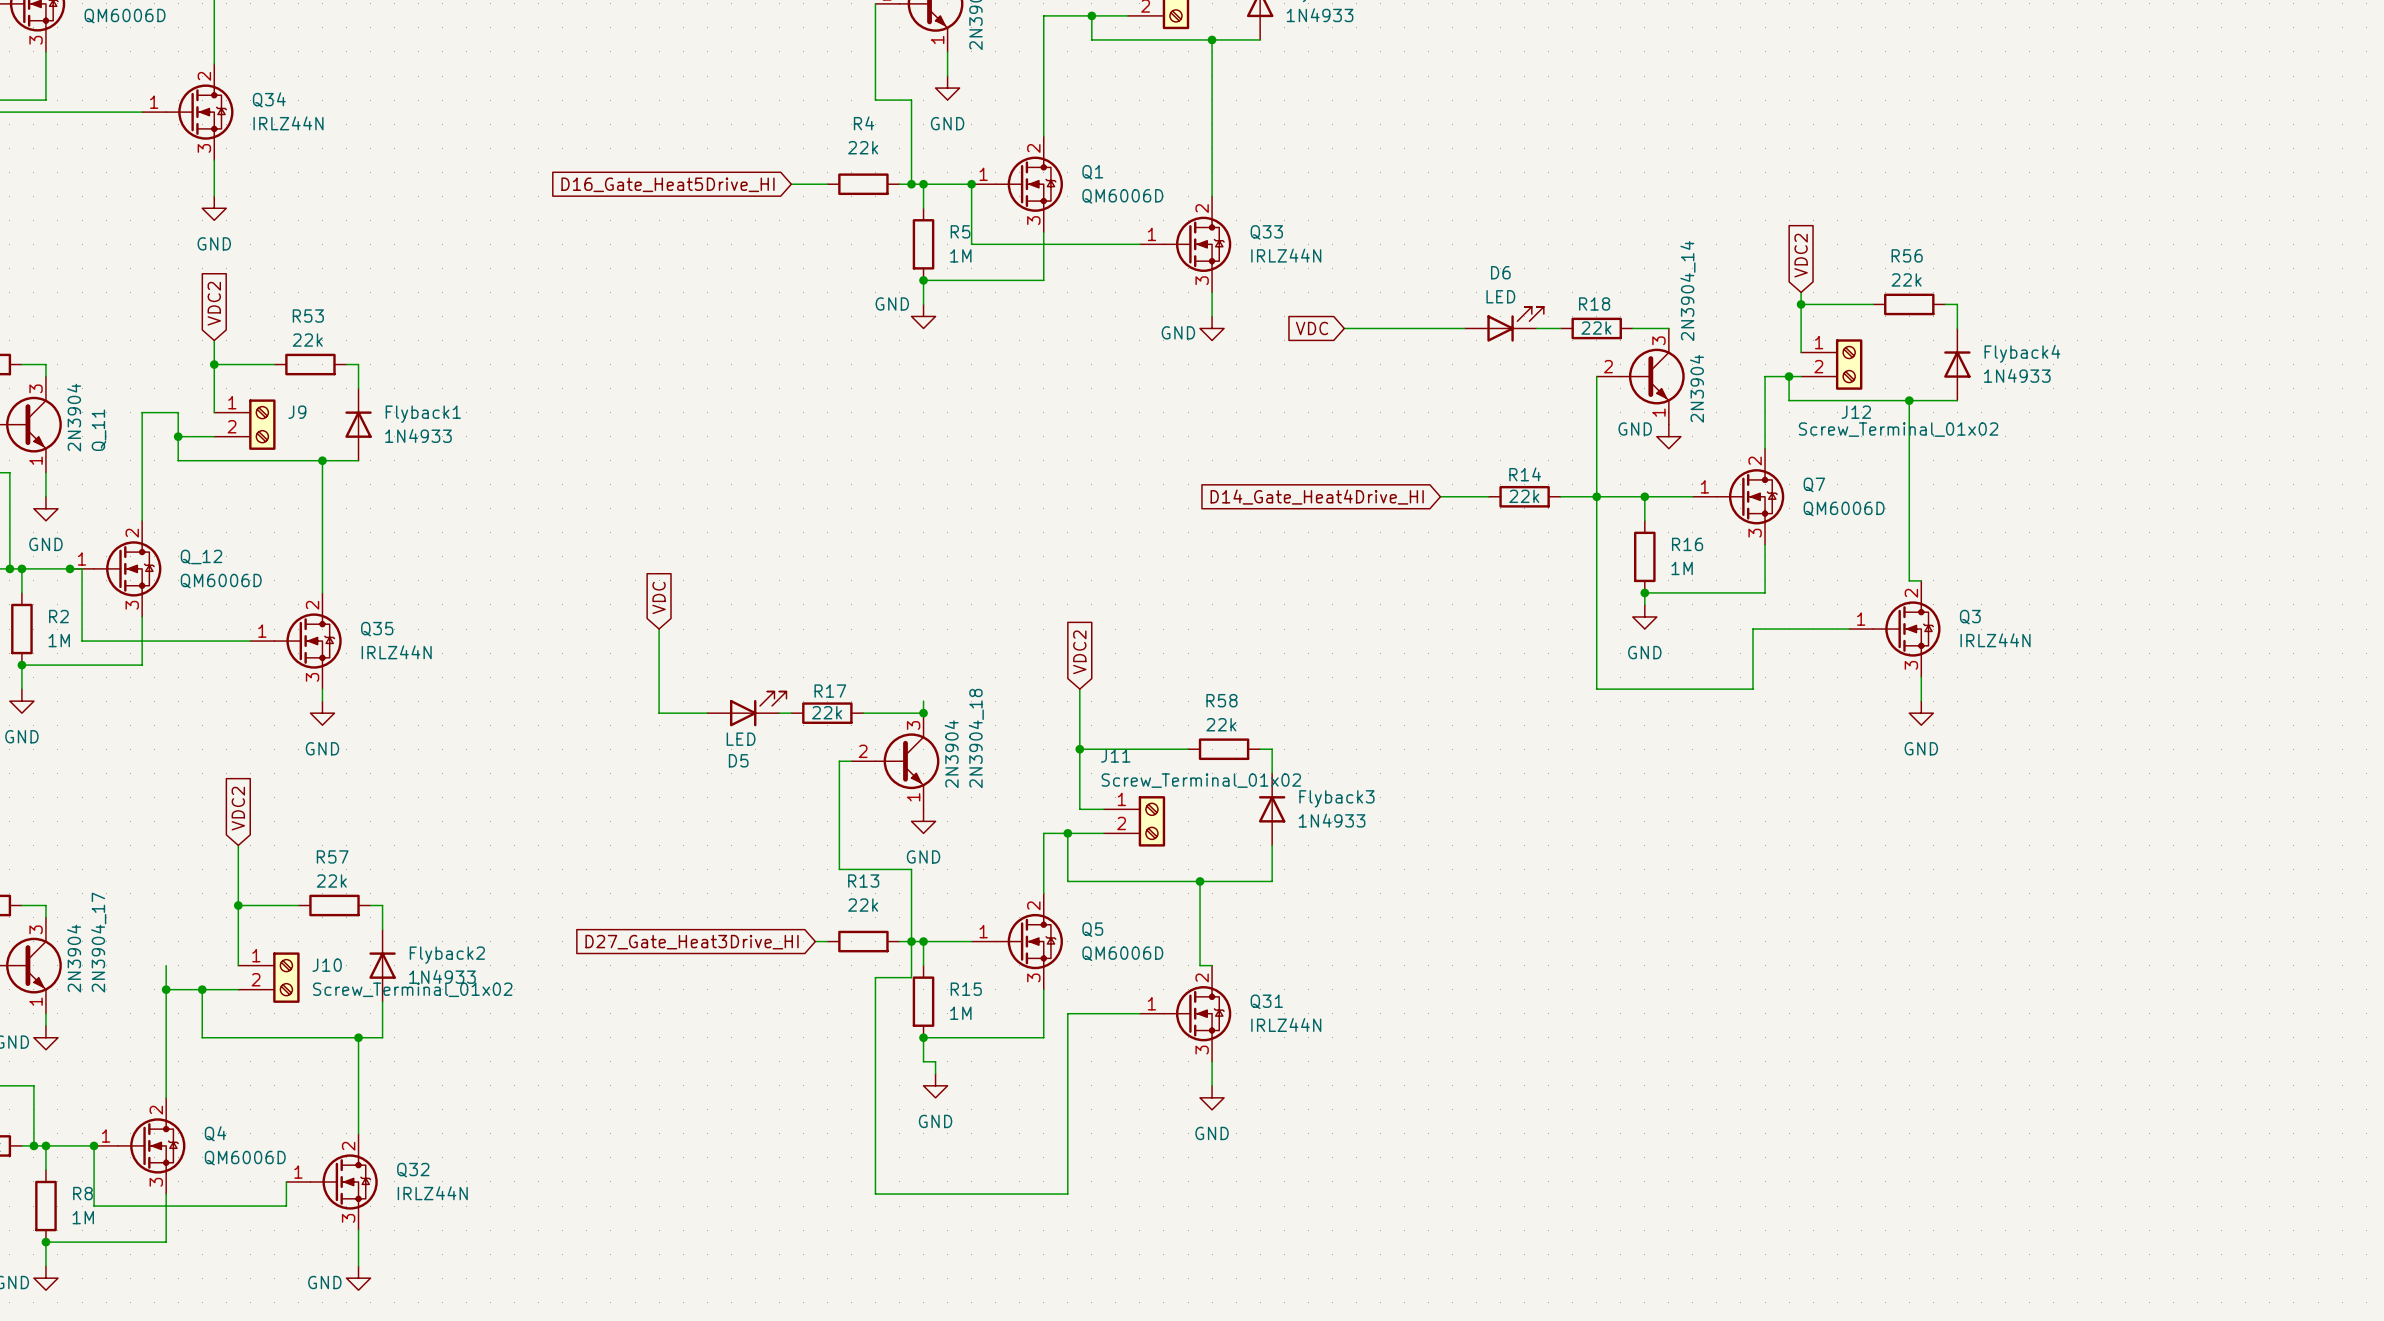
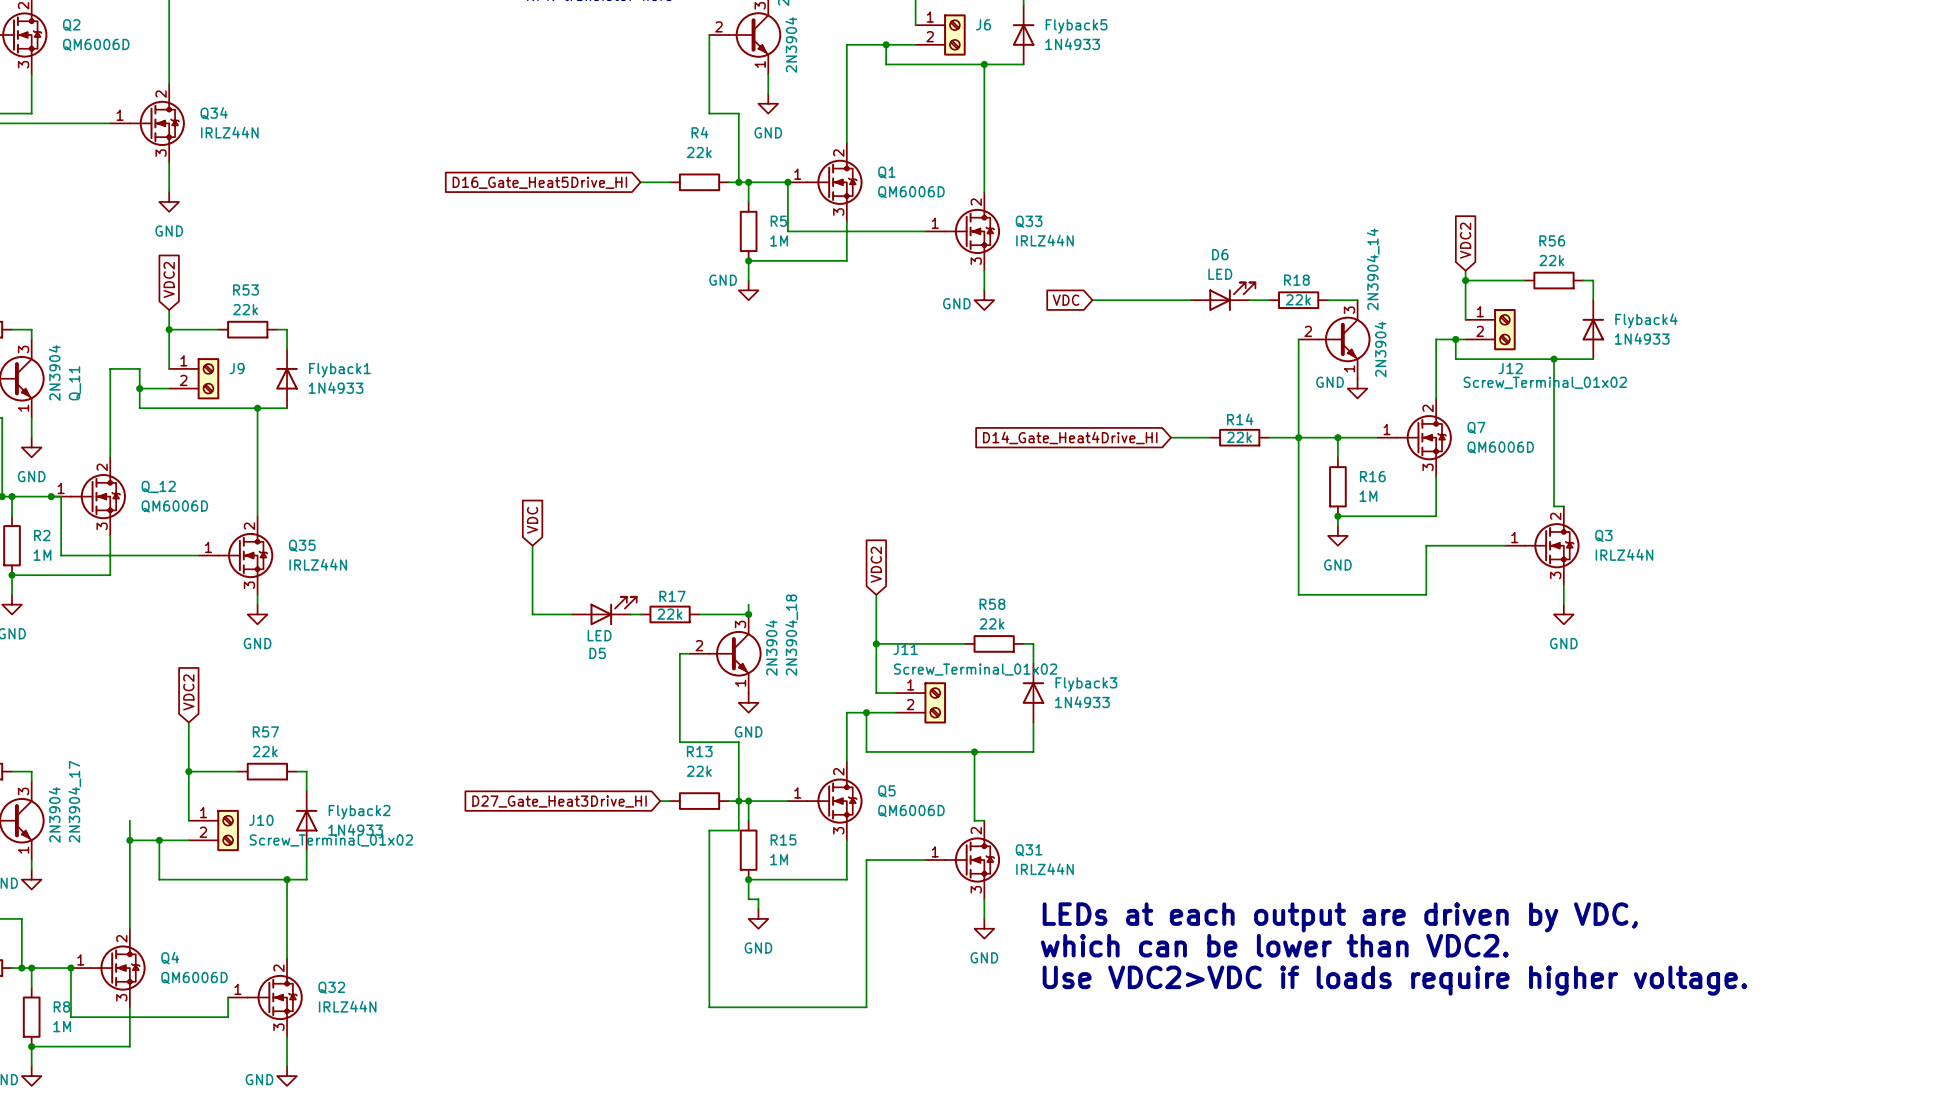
text: none -> LEDs at each output are driven by VDC, (1340, 917)
text: none -> which can be lower than VDC2. (1274, 945)
text: none -> Use VDC2>VDC if loads require higher voltage. (1394, 980)

